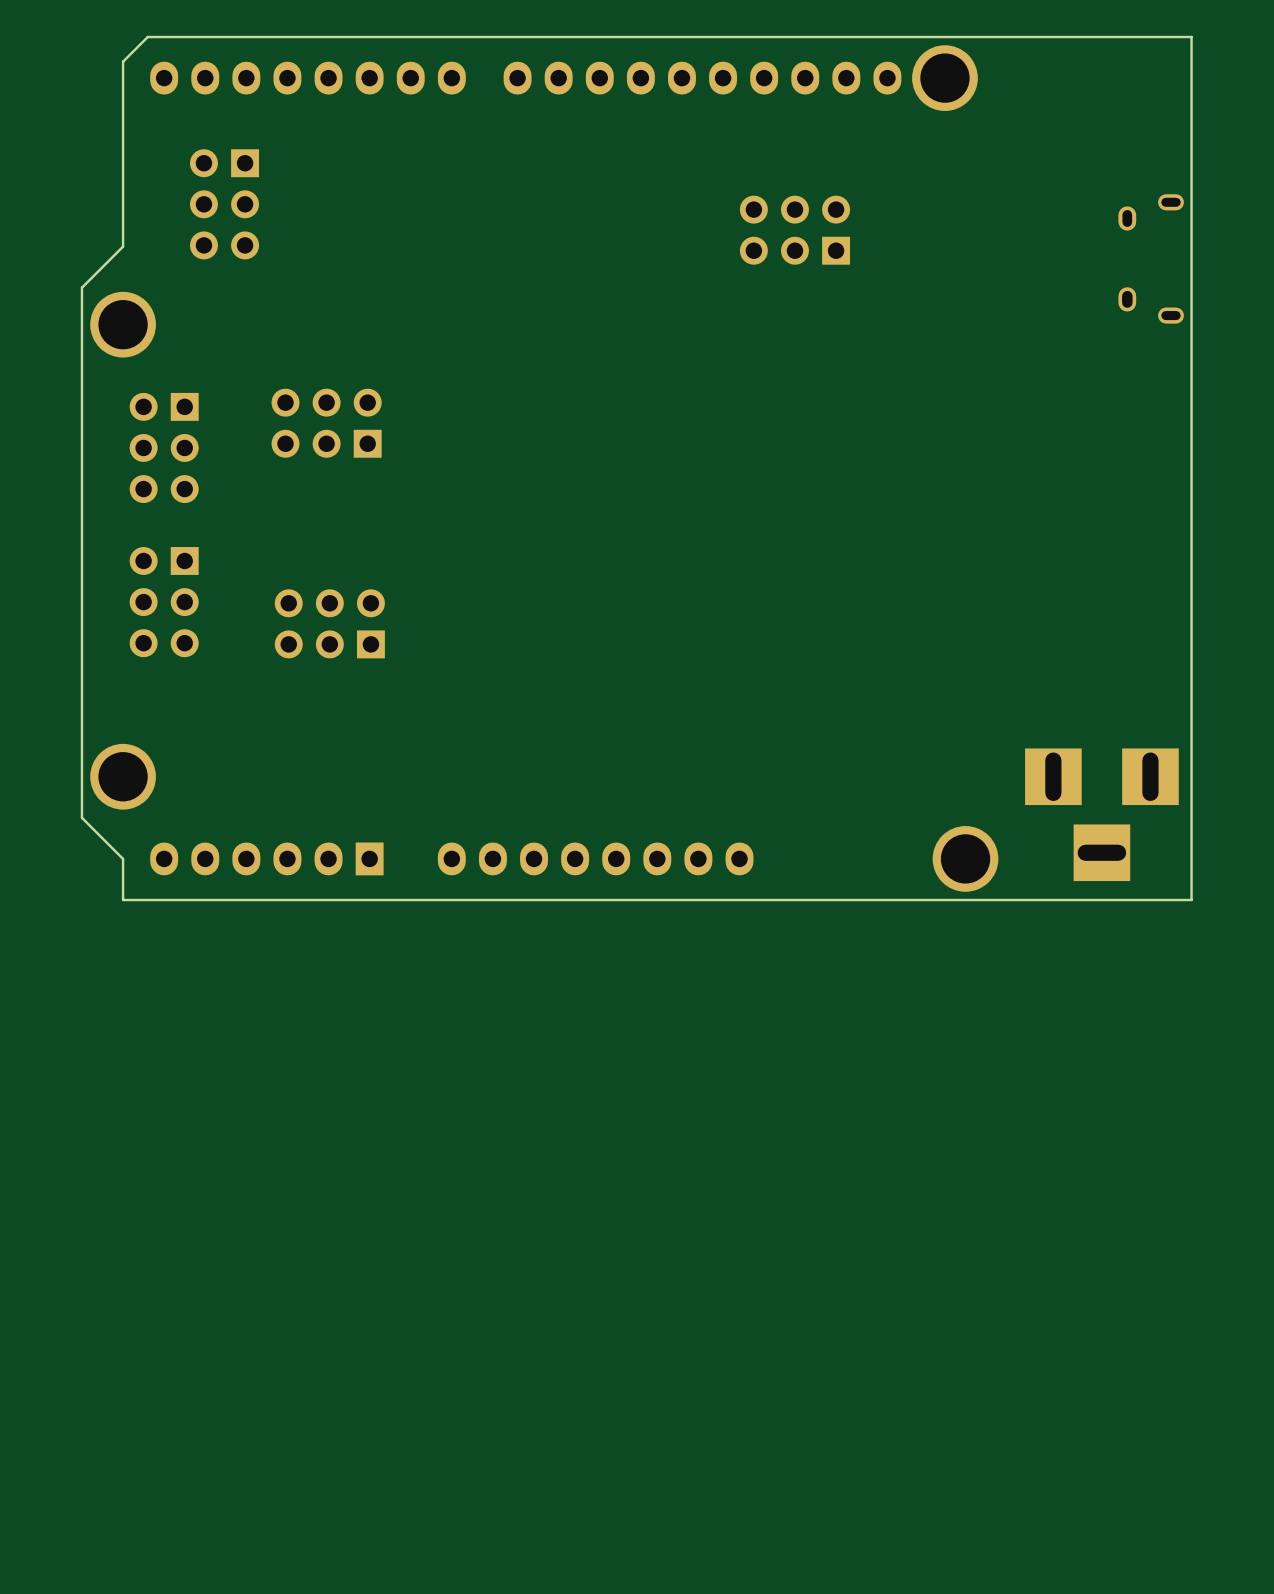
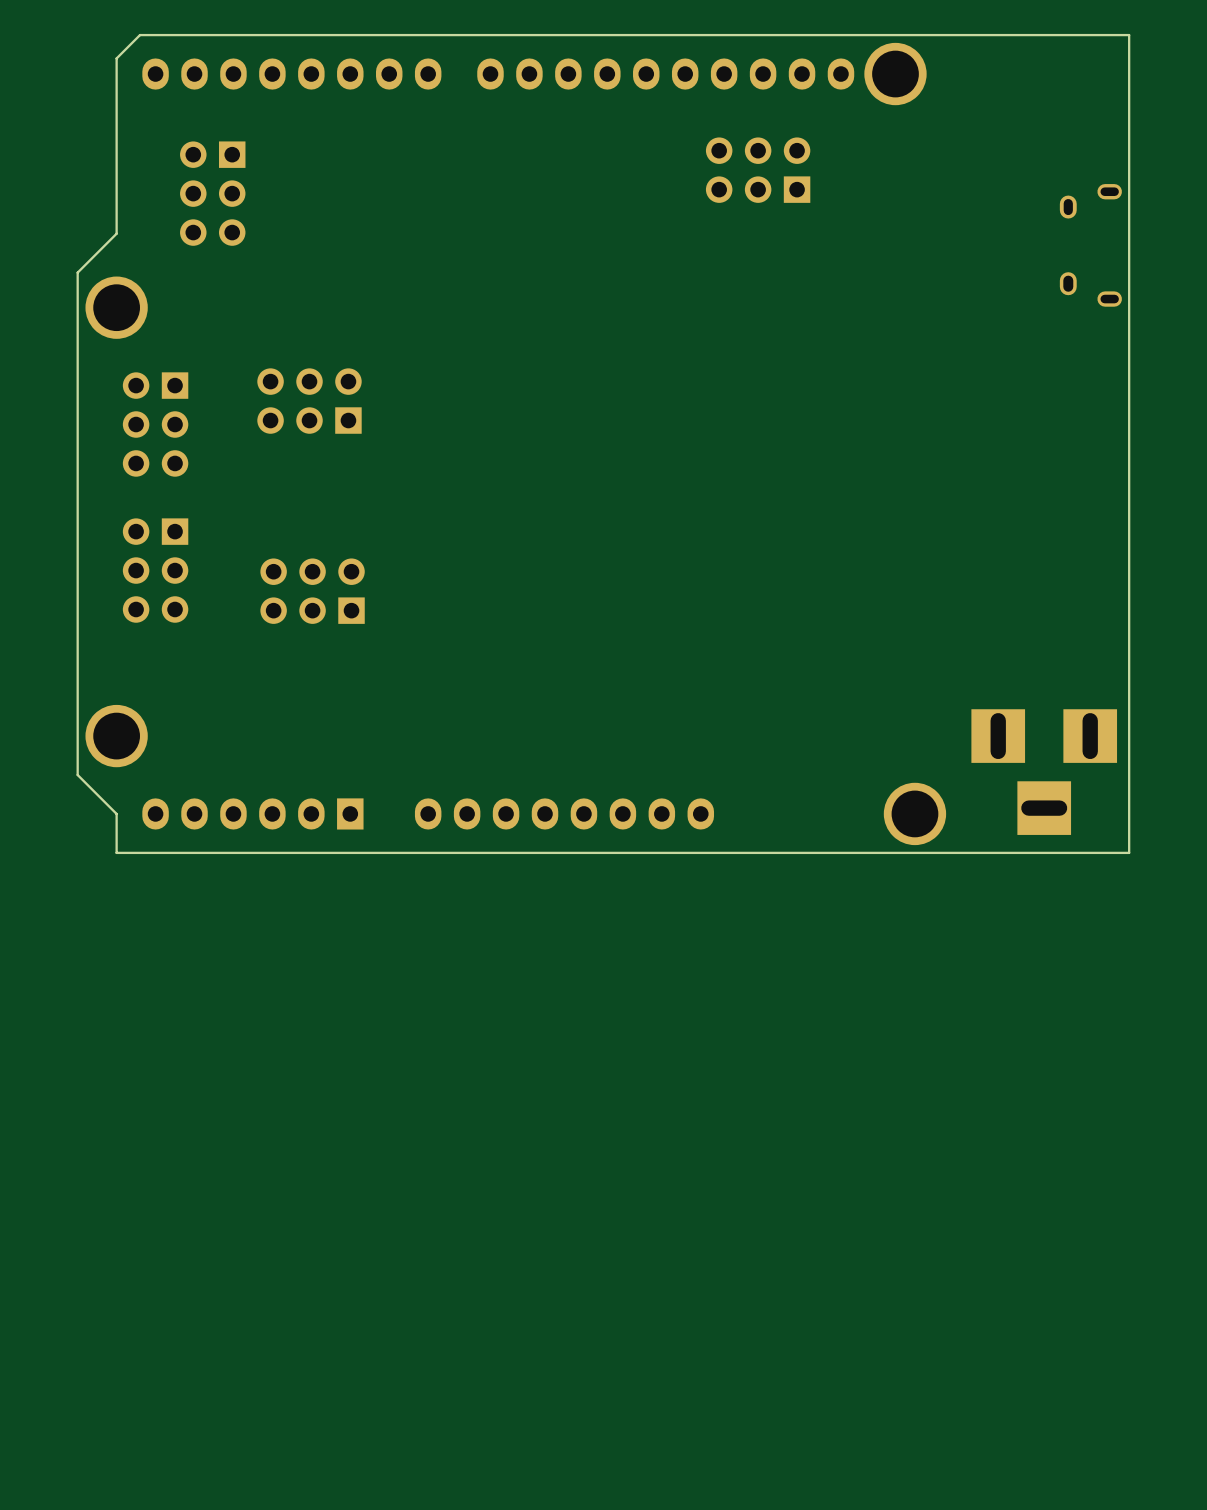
part position: (794, 230) -> (758, 170)

